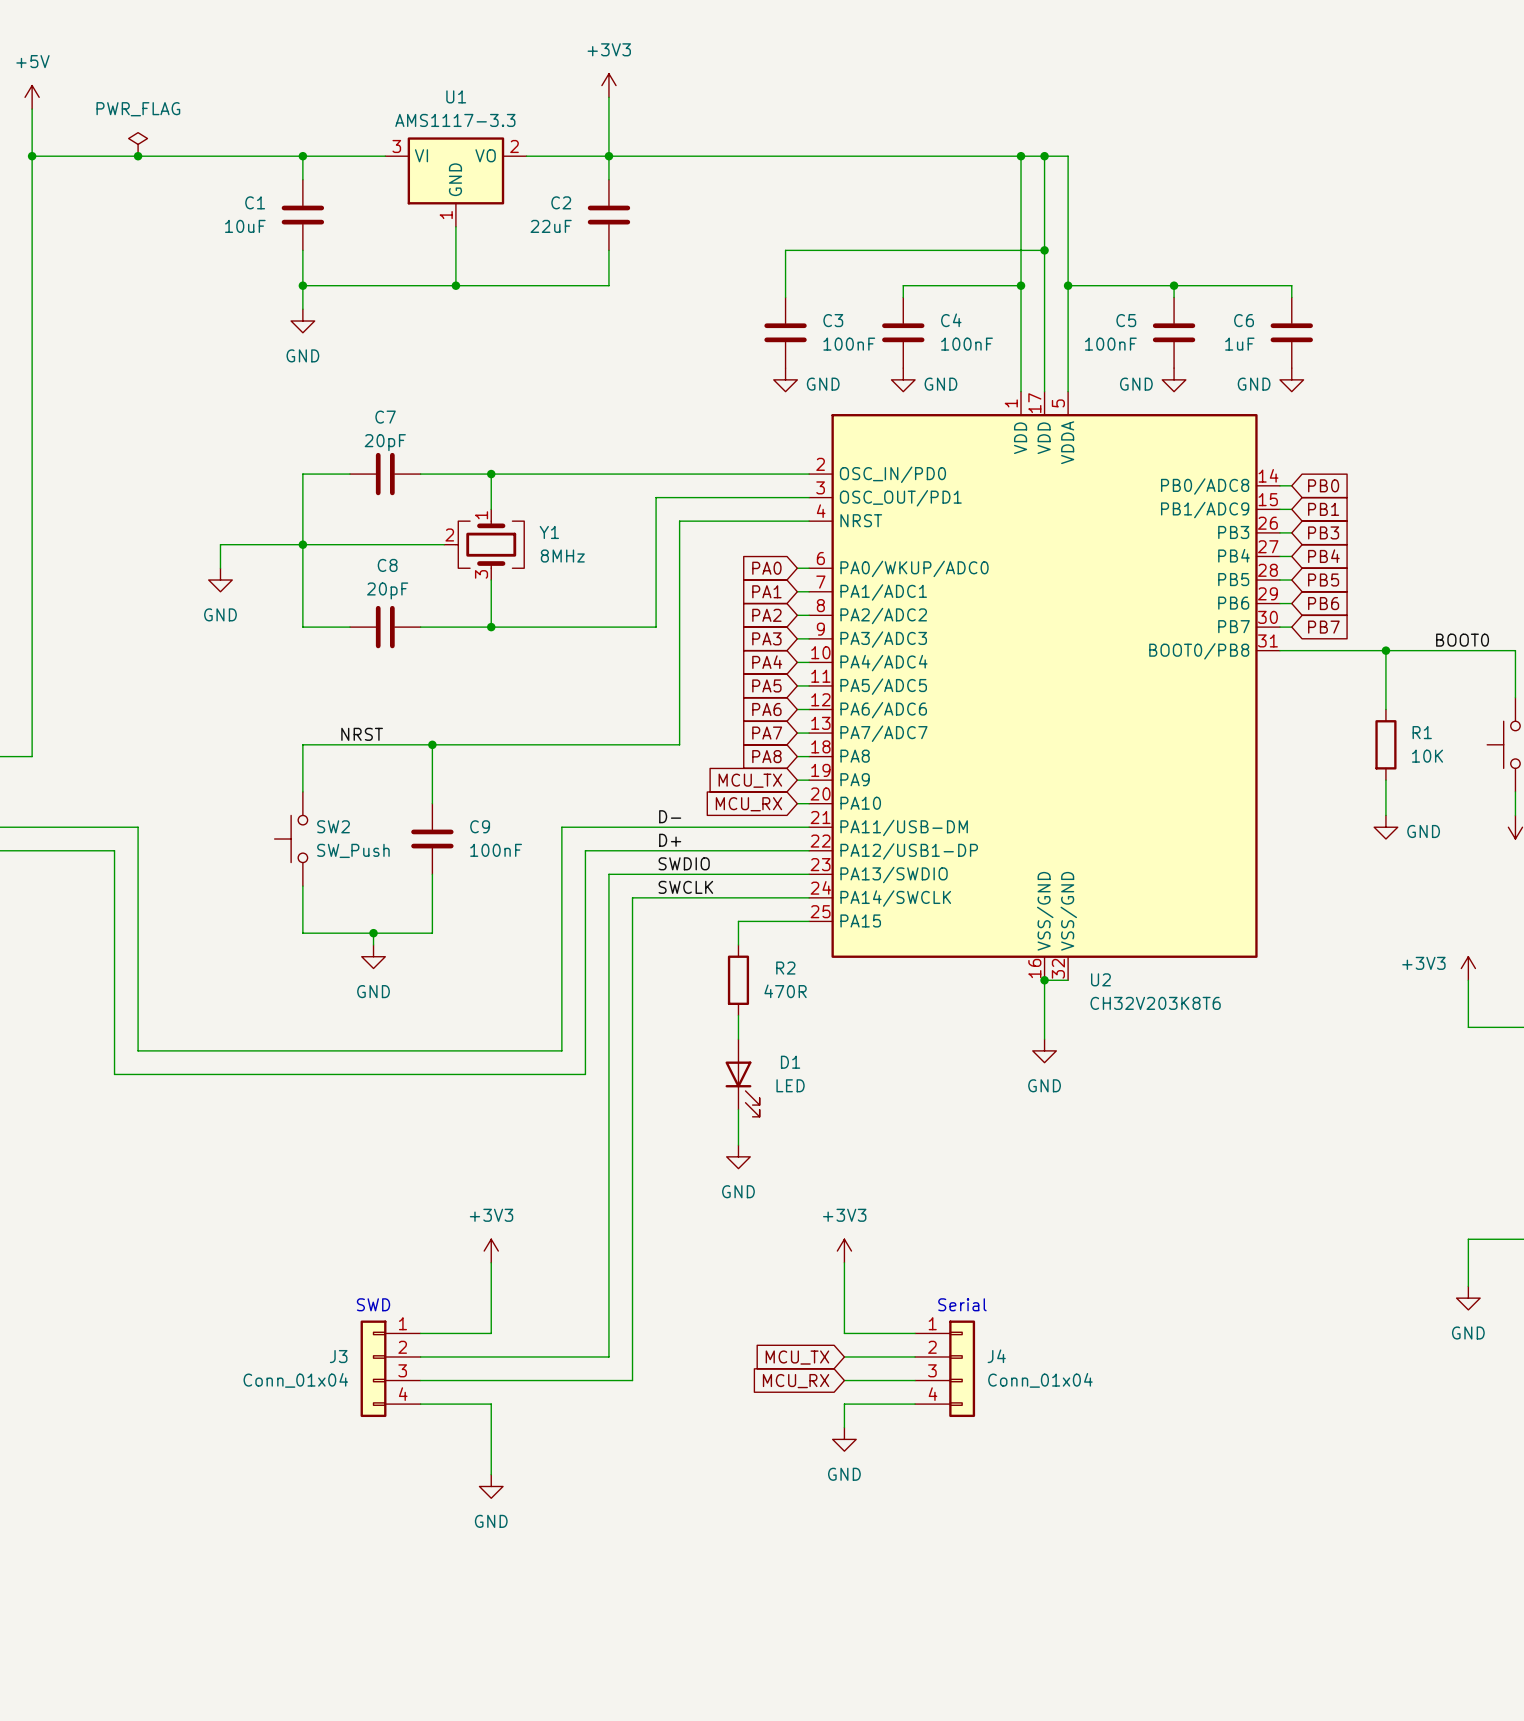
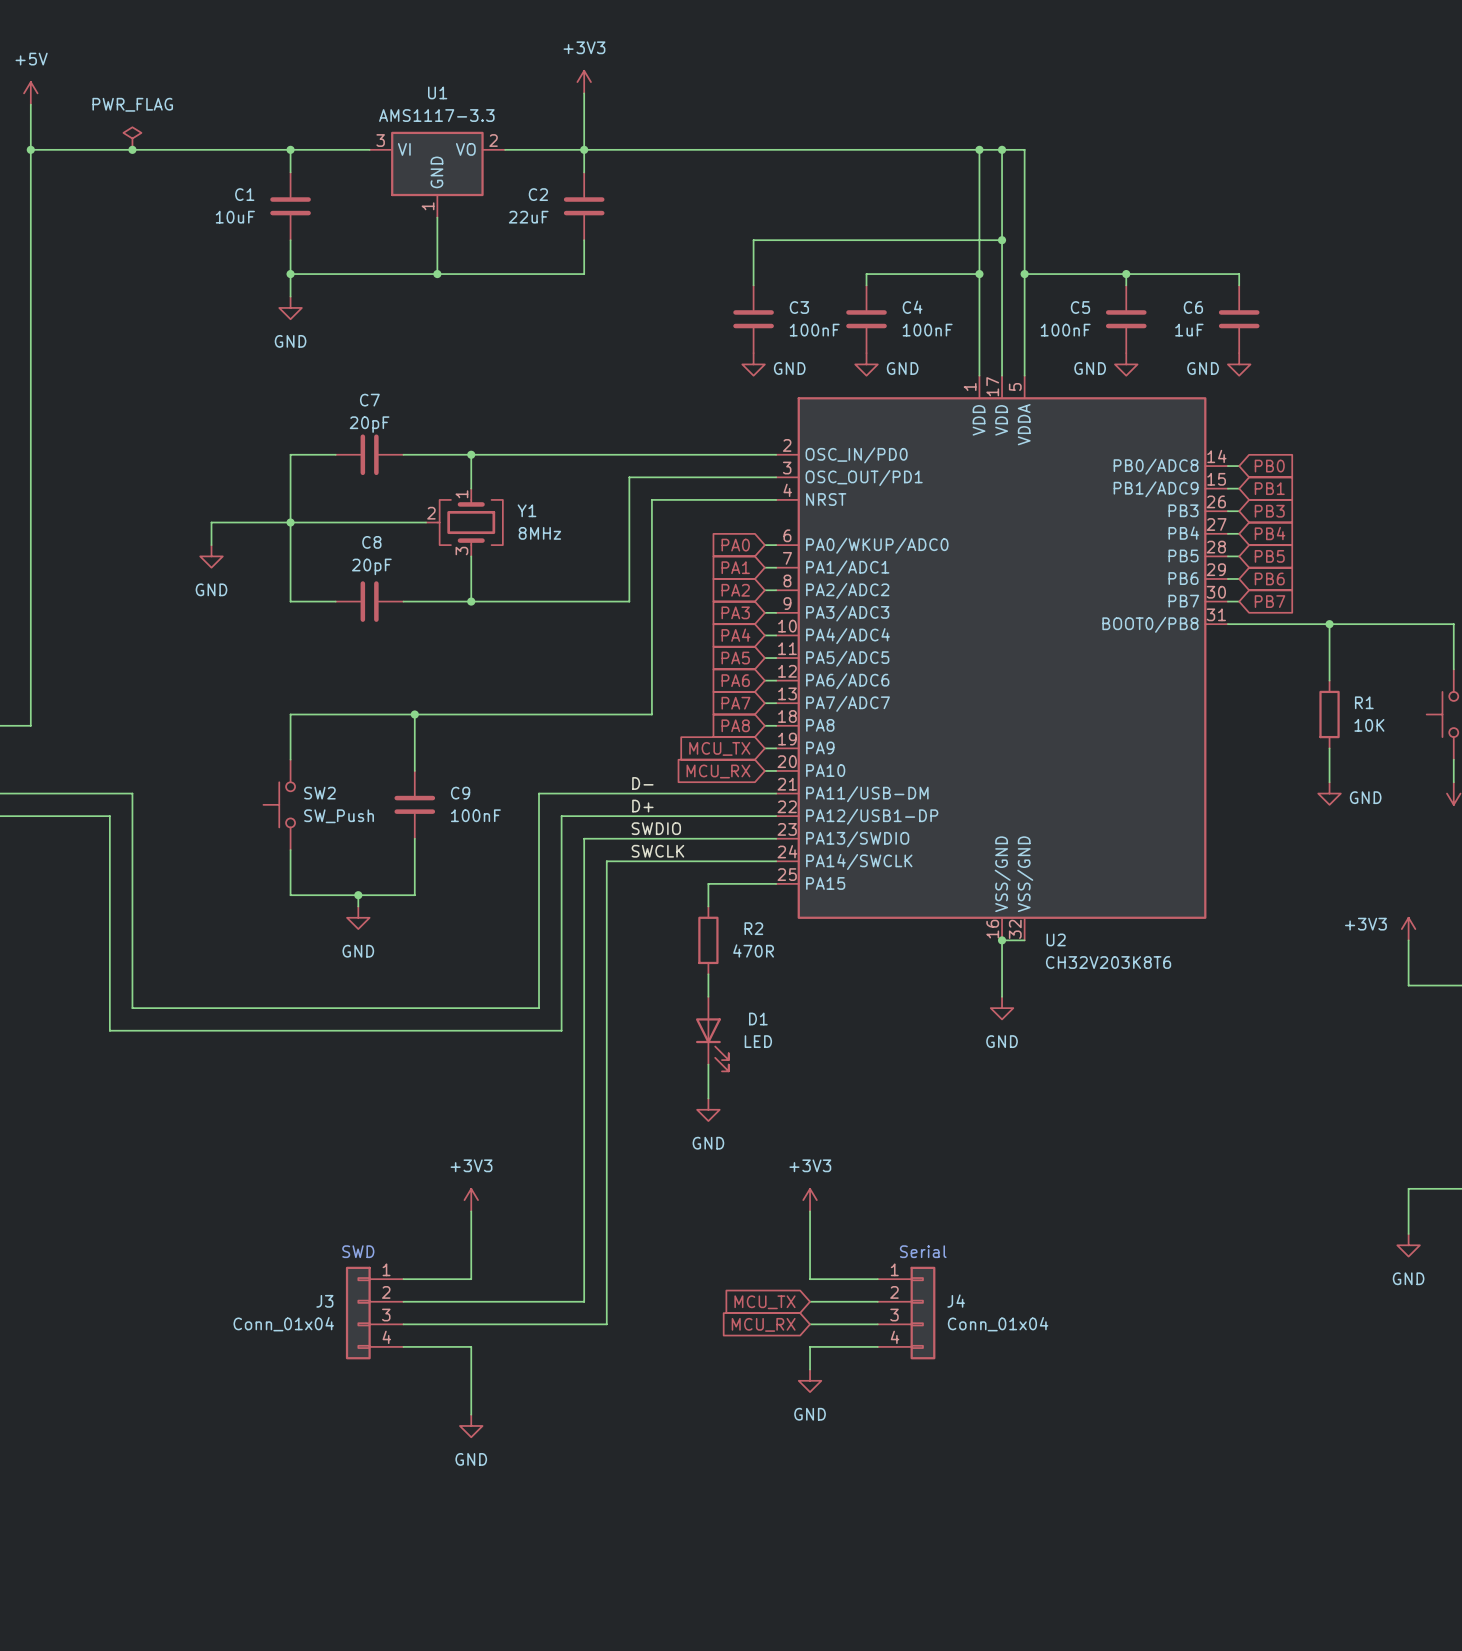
label: BOOT0 (1462, 640) -> none
label: NRST (362, 734) -> none

